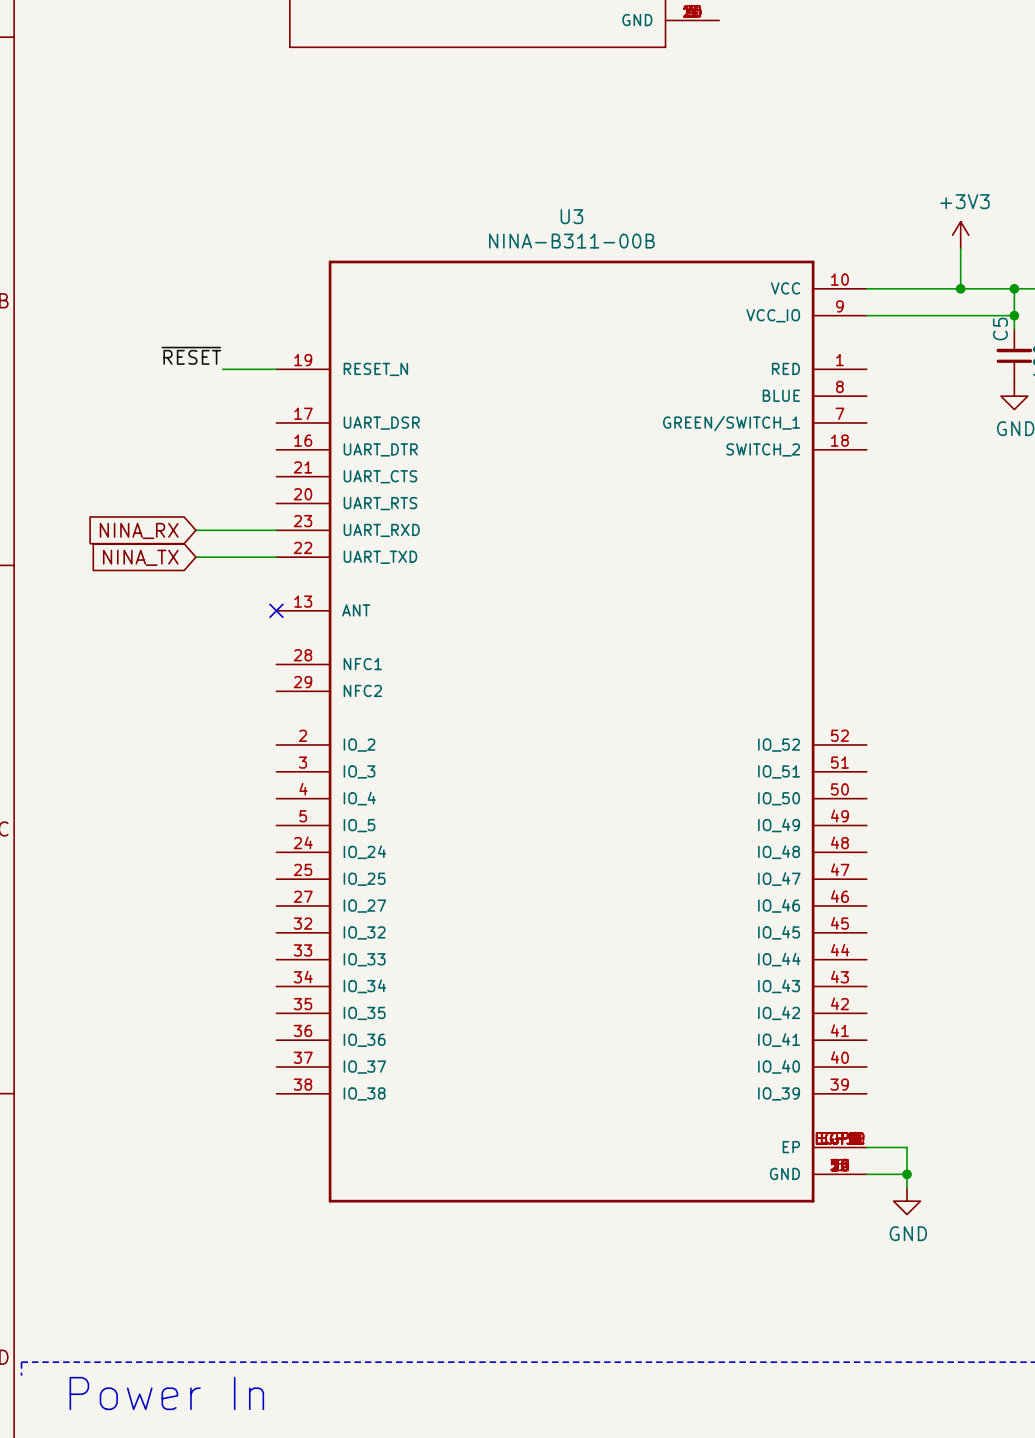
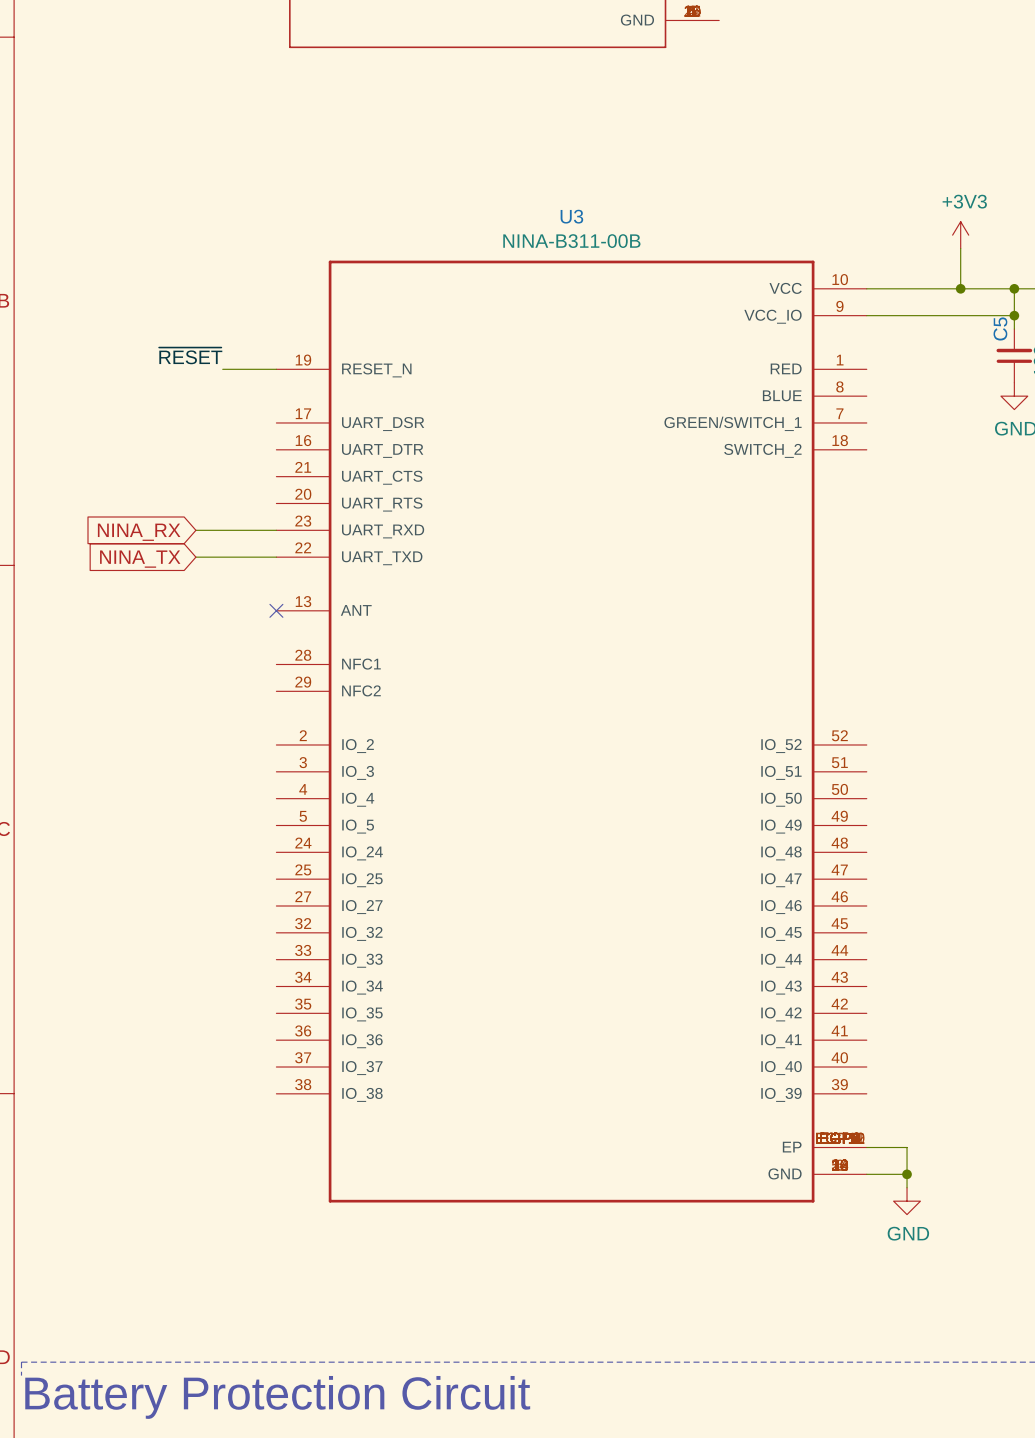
text: Power In (166, 1393) -> none
text: none -> Battery Protection Circuit (277, 1397)

